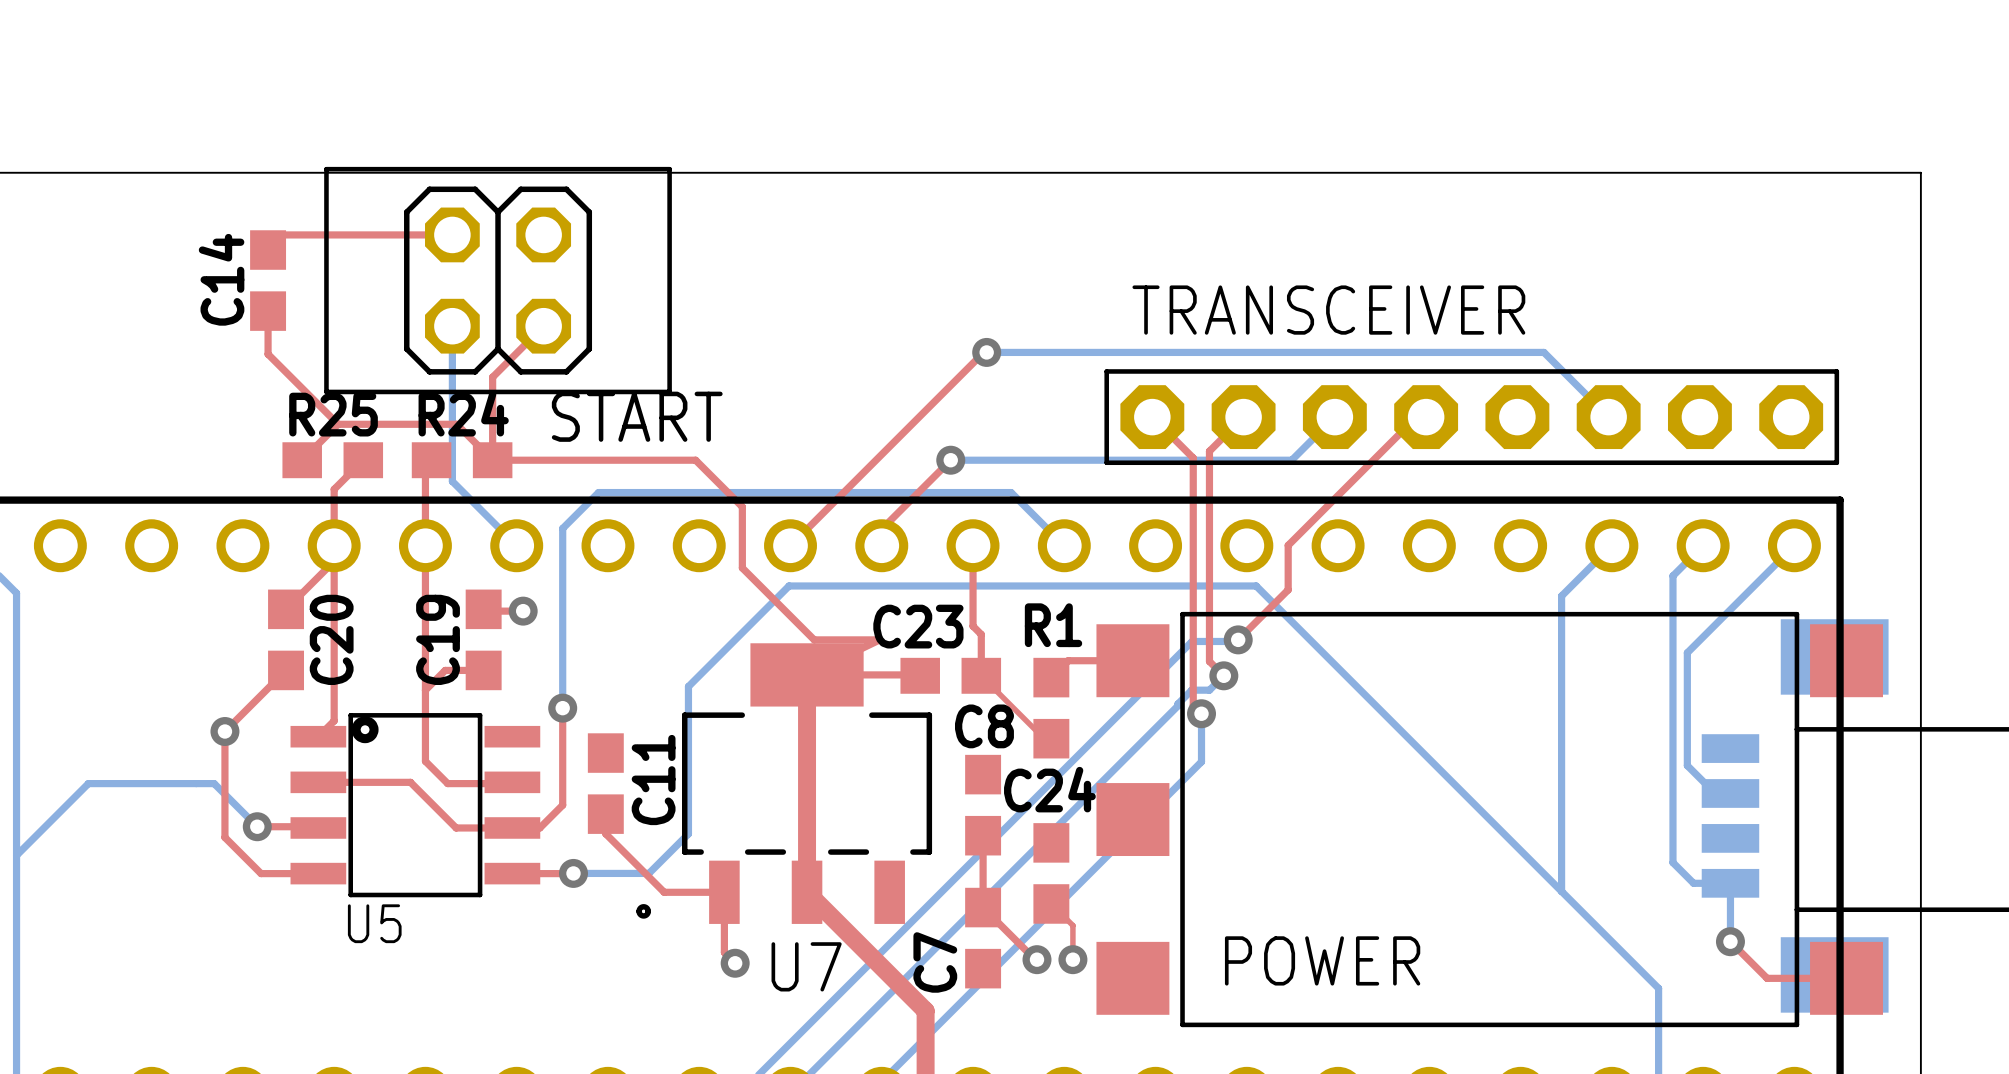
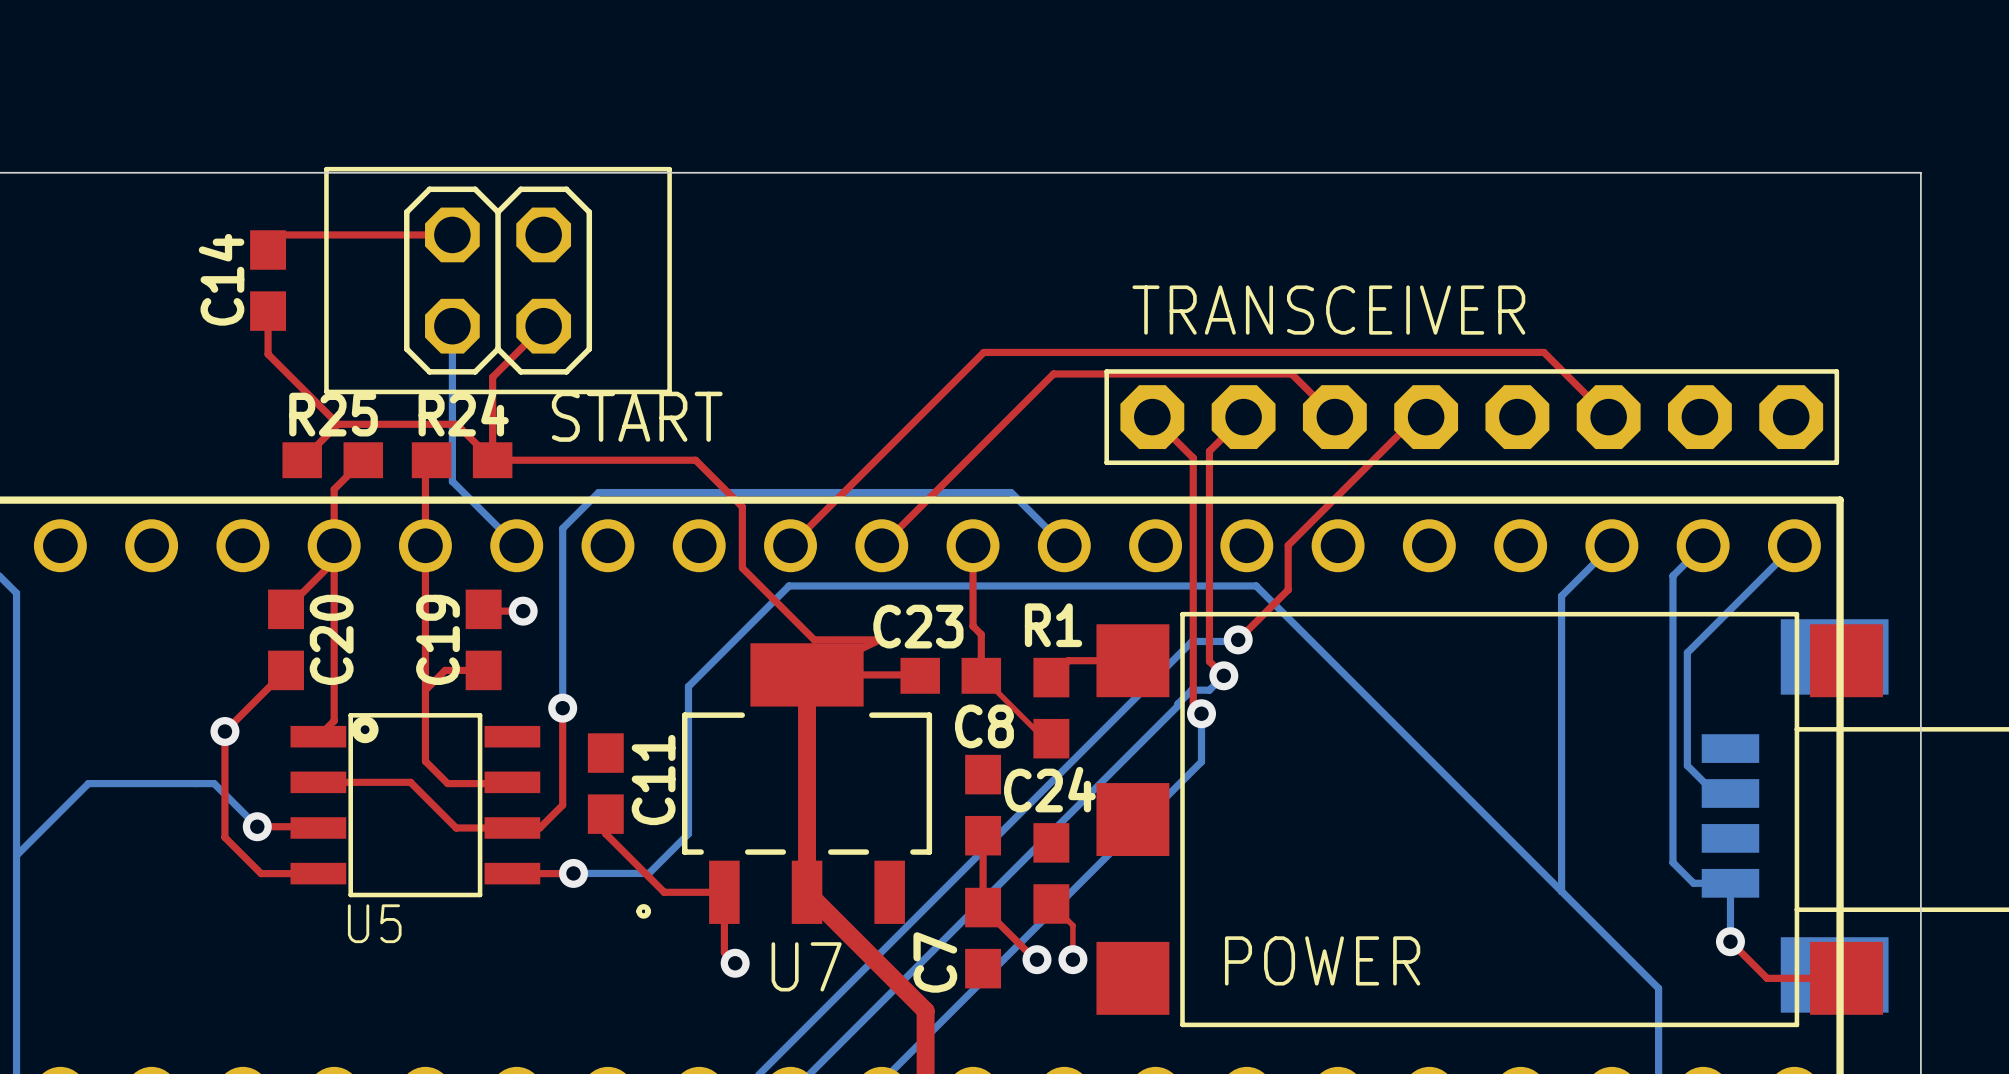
top track: none -> (986, 352) (1543, 352) (1608, 417)
bottom track: (986, 352) (1543, 352) (1608, 417) -> none
via: (986, 352) -> none
bottom track: (1334, 417) (1291, 460) (950, 460) -> none
top track: (950, 460) (881, 529) (881, 545) -> (1334, 417) (1291, 373) (1053, 373) (881, 545)
via: (950, 460) -> none

